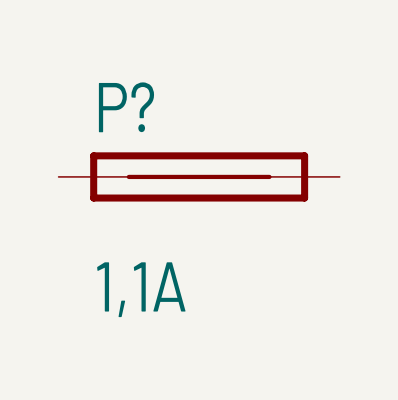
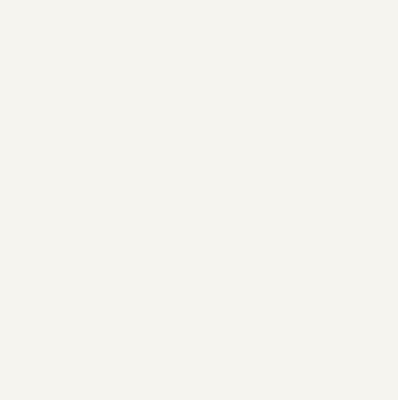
P?: 1,1A (199, 176) -> none

